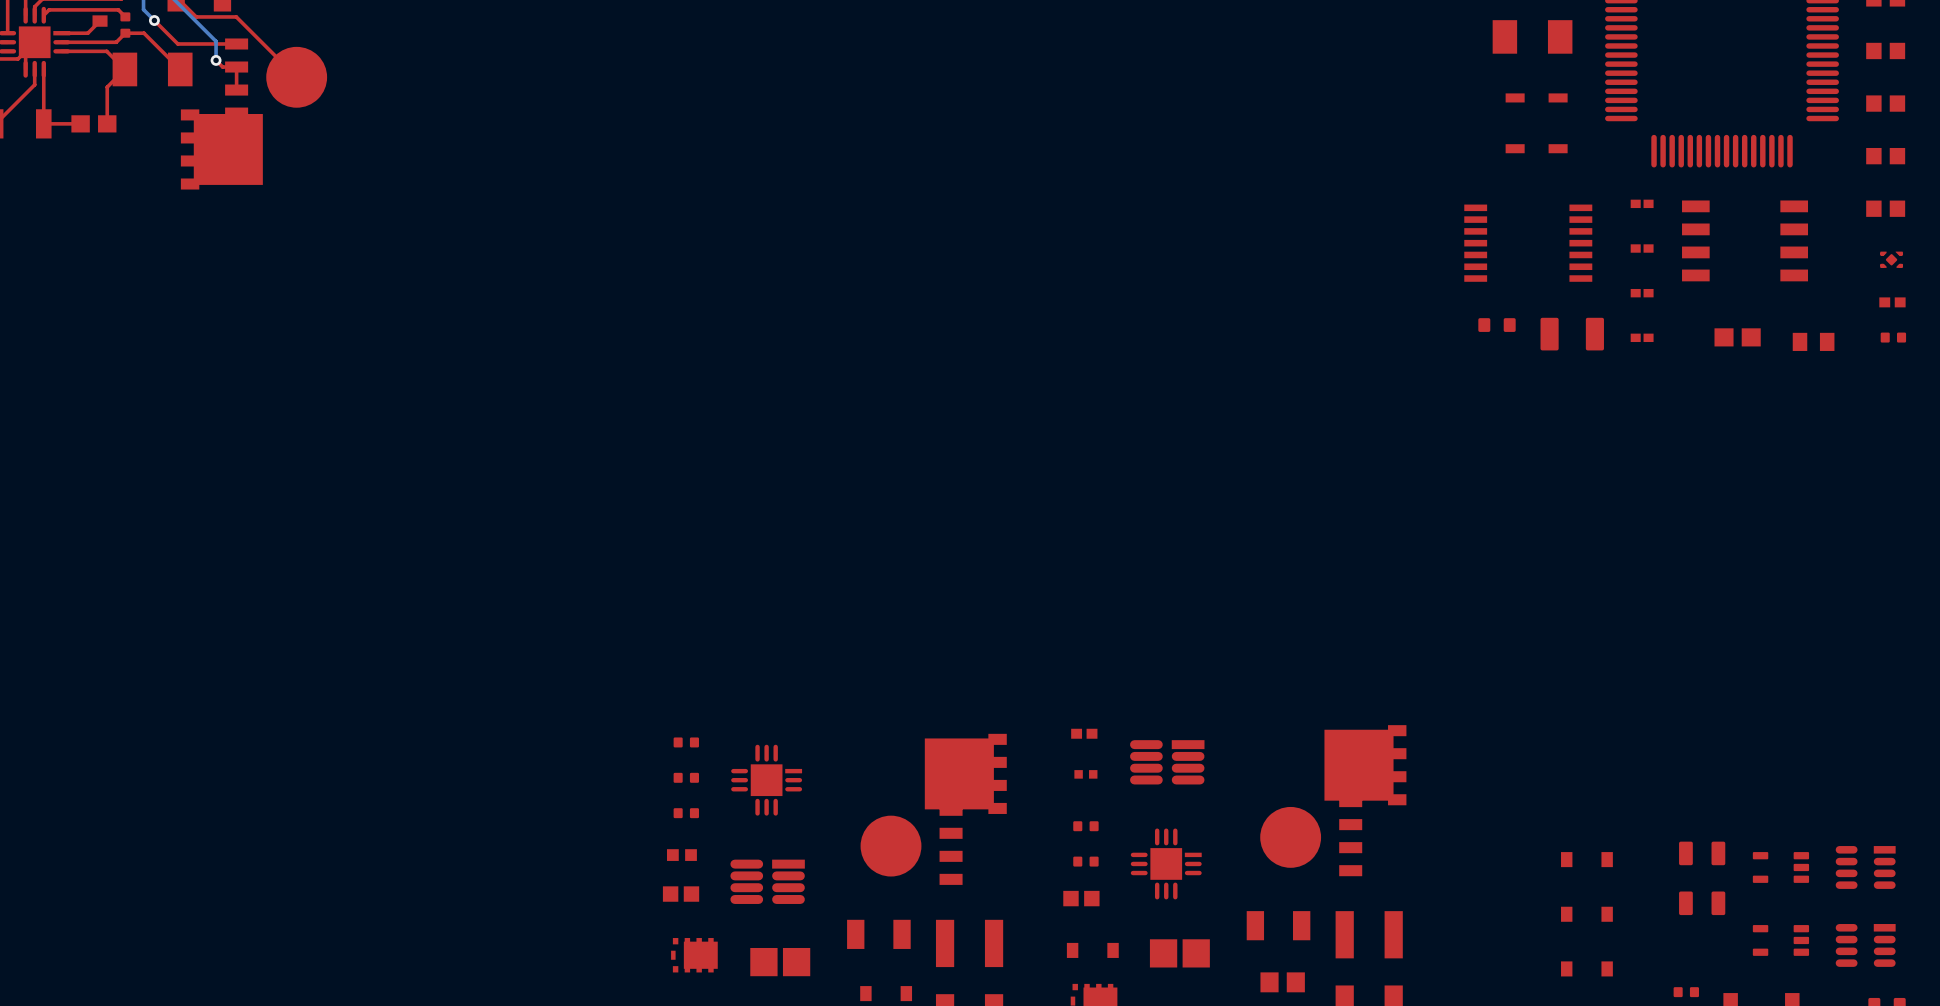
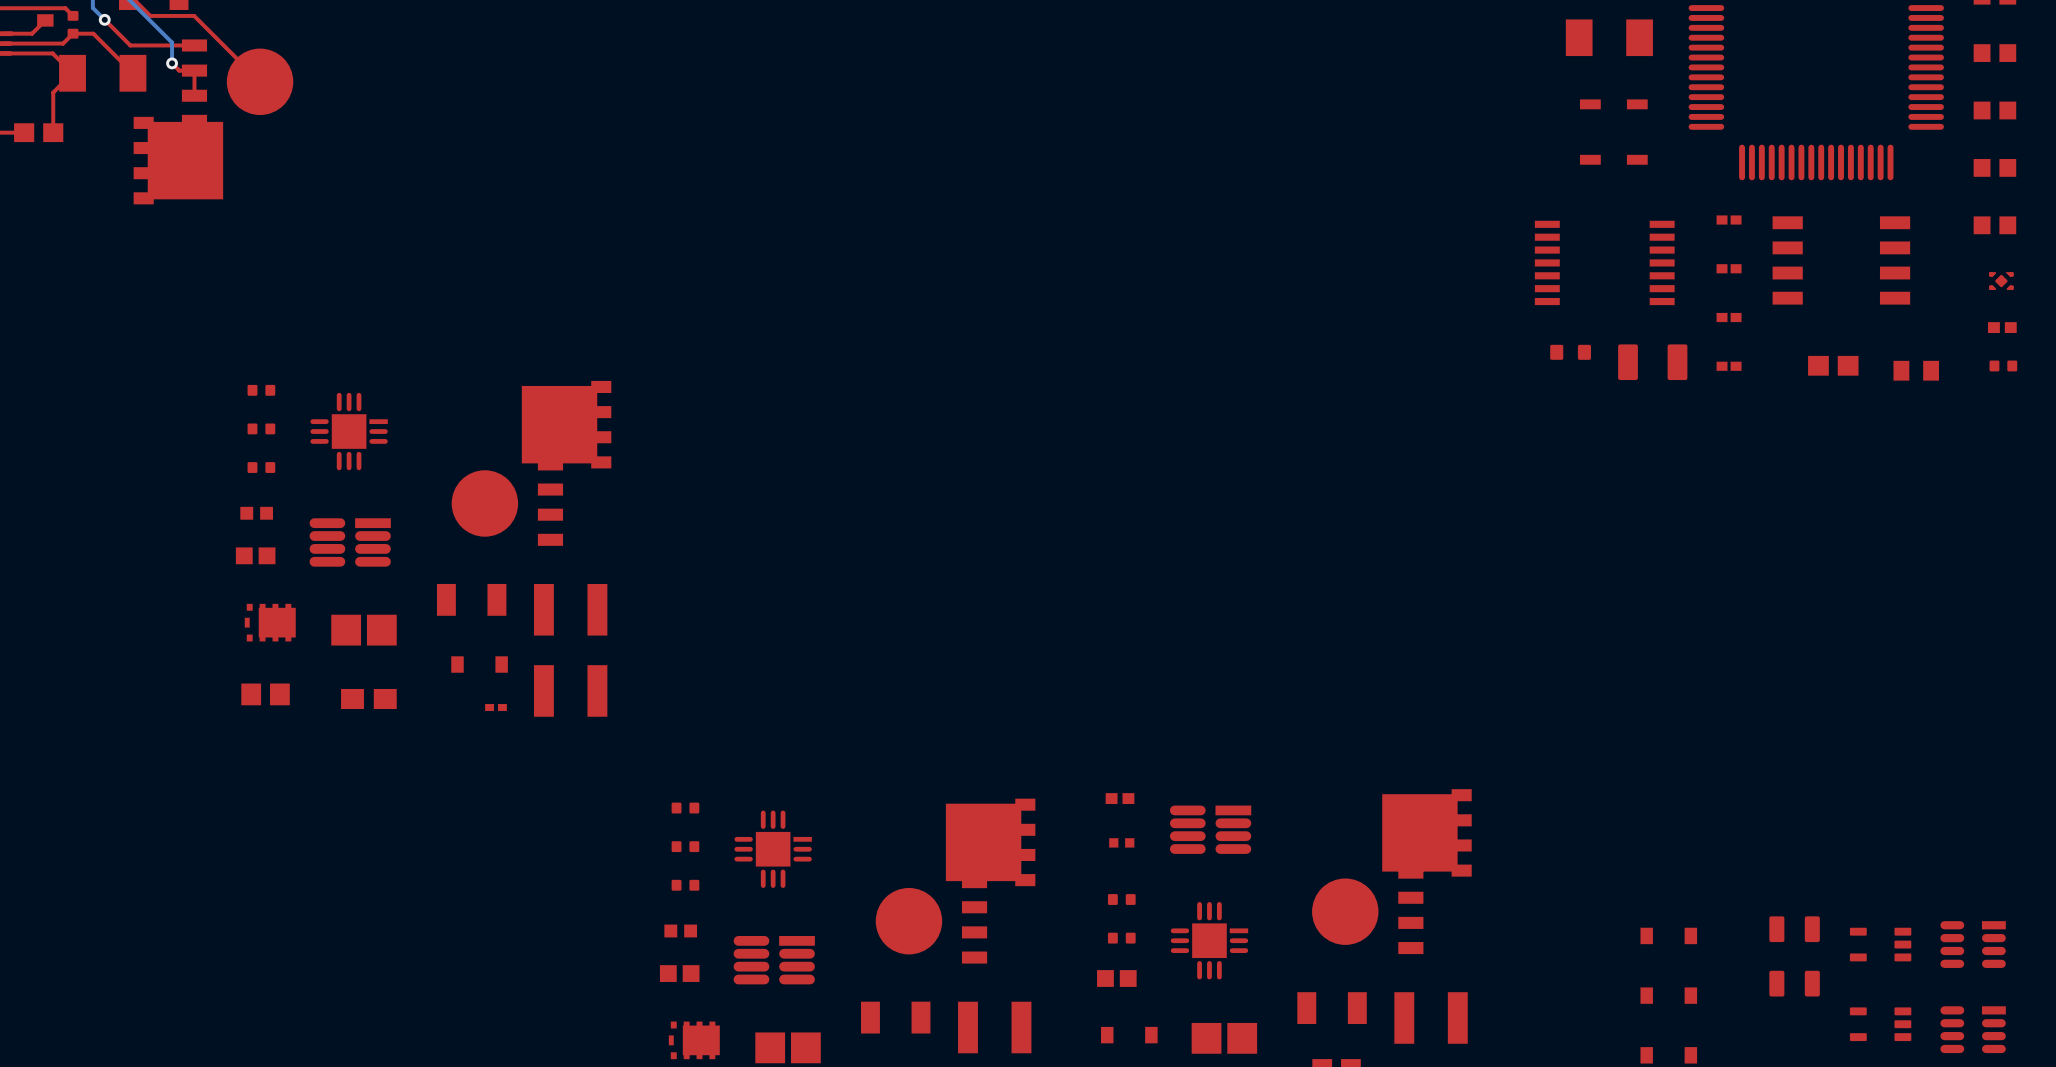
part: none -> (261, 390)
part: none -> (261, 428)
part: none -> (349, 431)
part: none -> (531, 463)
part: none -> (261, 467)
part: none -> (256, 513)
part: none -> (350, 542)
part: none -> (255, 555)
part: none -> (471, 599)
part: none -> (570, 609)
part: none -> (270, 622)
part: none -> (363, 630)
part: none -> (479, 664)
part: none -> (570, 690)
part: none -> (265, 694)
part: none -> (368, 698)
part: none -> (496, 707)

